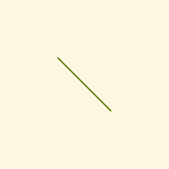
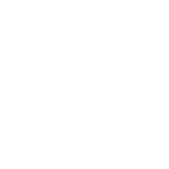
wire: (57, 57) (110, 110) -> none

